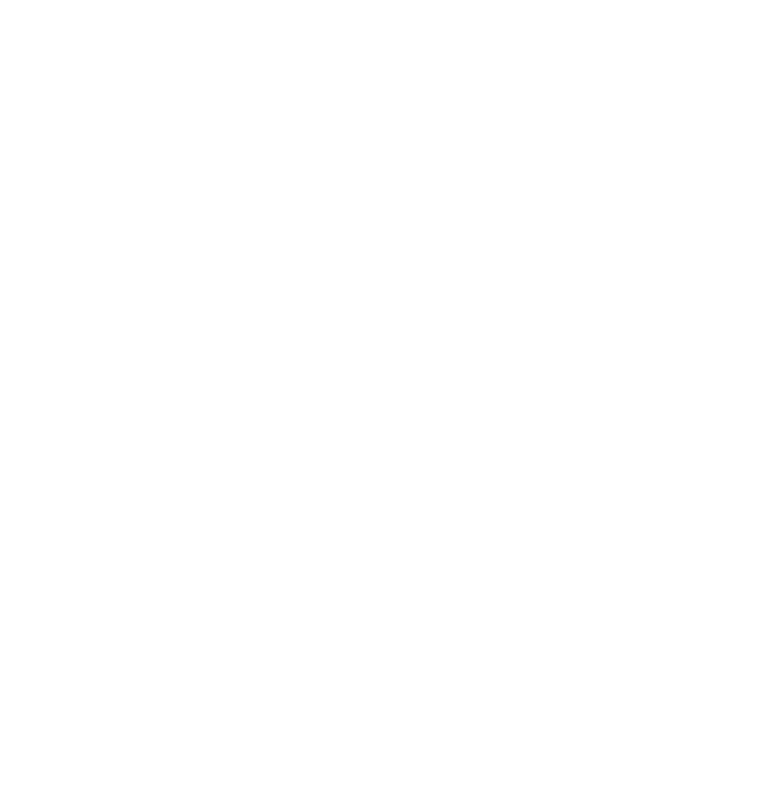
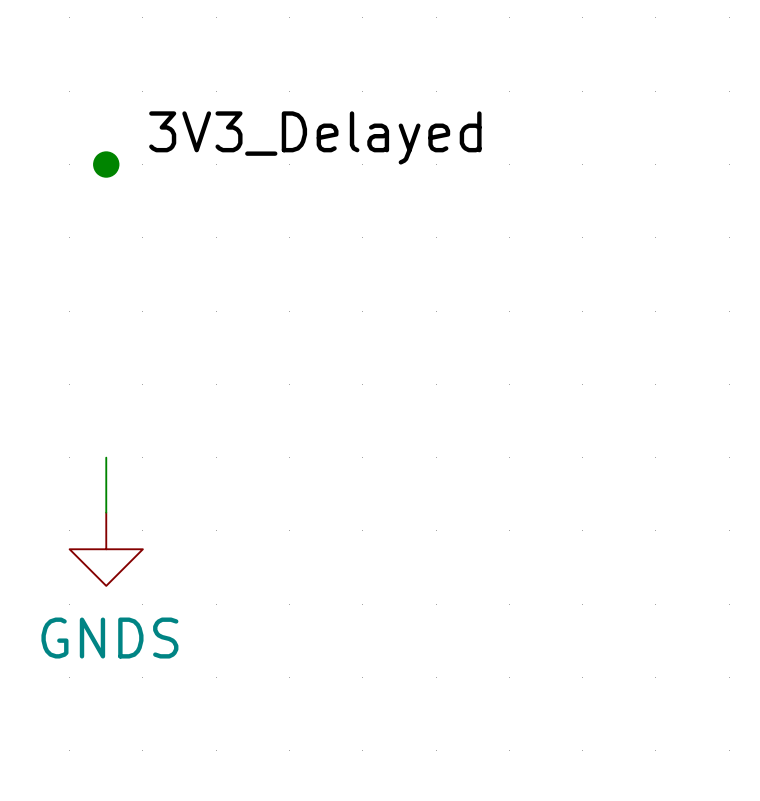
label: none -> 3V3_Delayed (315, 137)
junction: none -> (106, 164)
wire: none -> (106, 457) (106, 512)
power symbol: none -> GNDS (106, 549)

